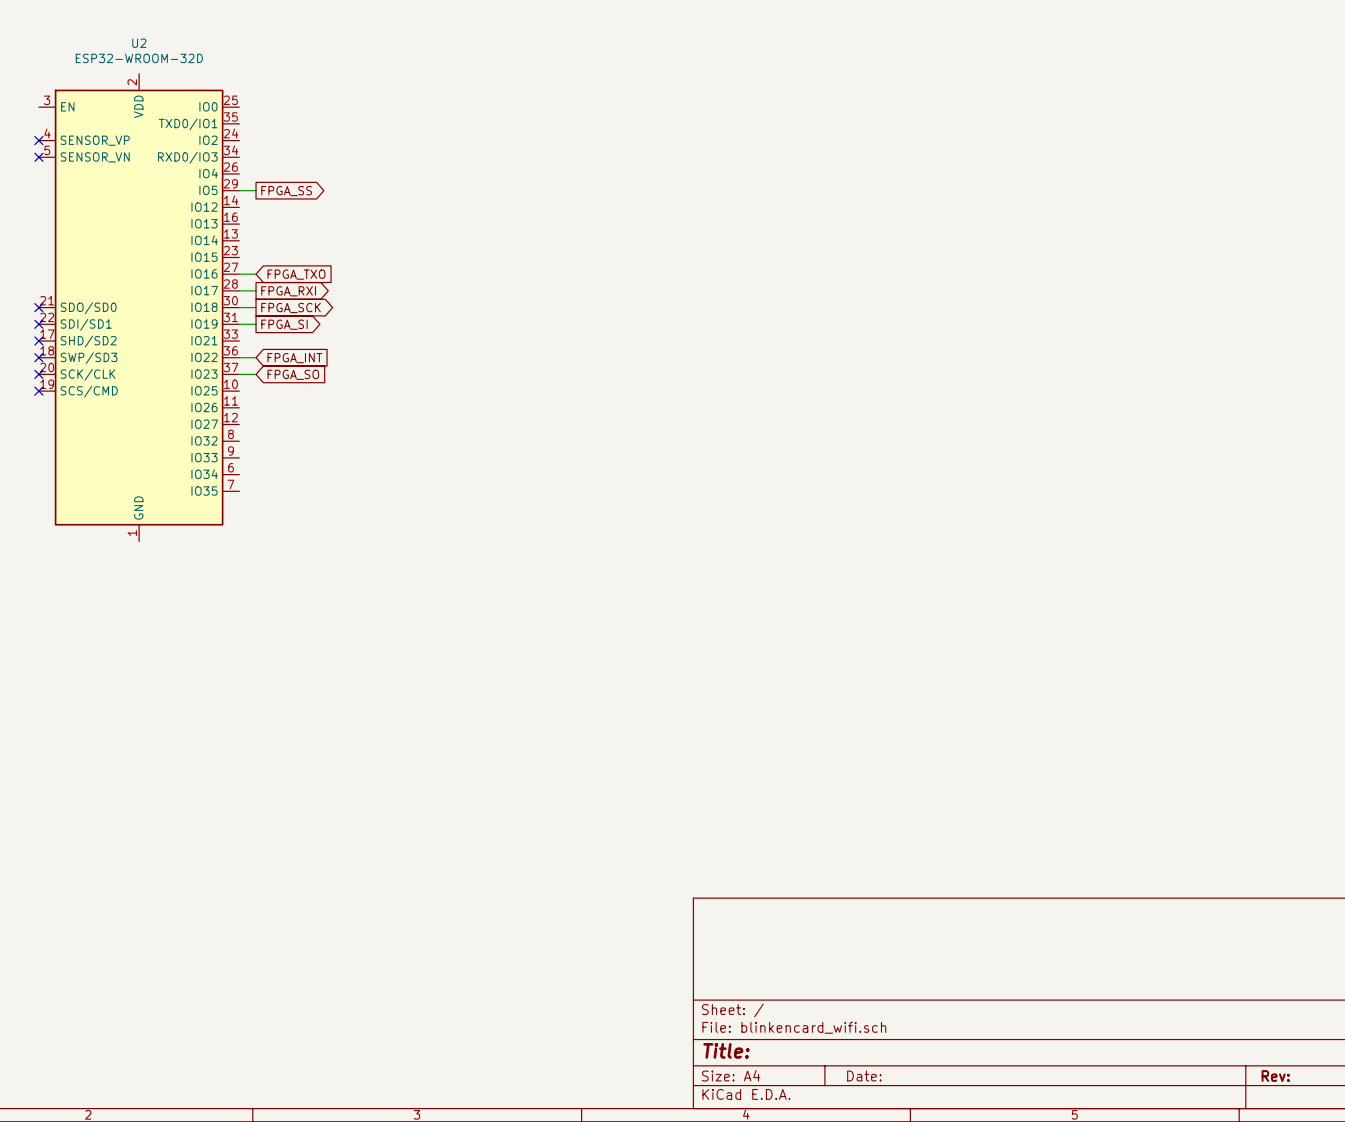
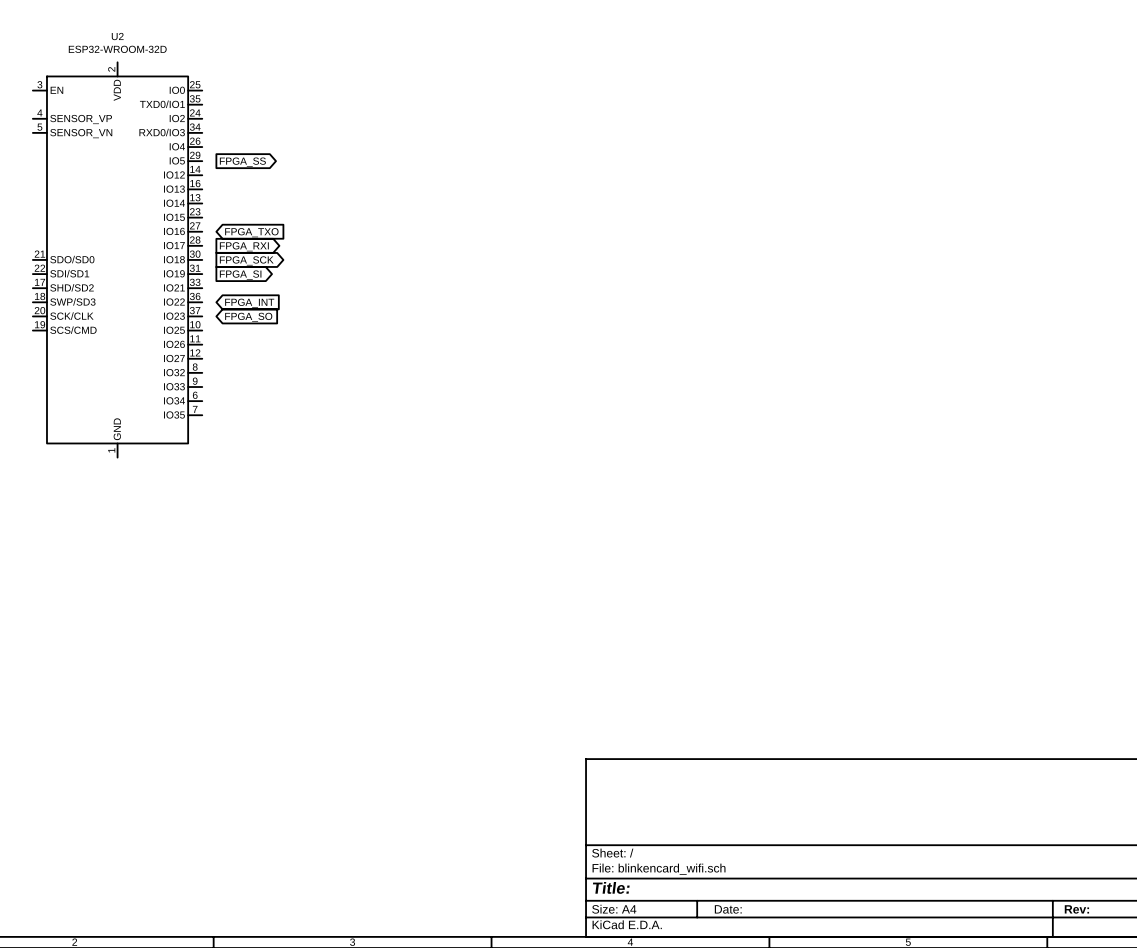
no-connect mark: (38, 140) -> none
no-connect mark: (38, 157) -> none
wire: (239, 190) (256, 190) -> none
wire: (239, 274) (256, 274) -> none
wire: (239, 290) (256, 290) -> none
no-connect mark: (38, 307) -> none
wire: (239, 307) (256, 307) -> none
no-connect mark: (38, 324) -> none
wire: (239, 324) (256, 324) -> none
no-connect mark: (38, 341) -> none
no-connect mark: (38, 357) -> none
wire: (239, 357) (256, 357) -> none
no-connect mark: (38, 374) -> none
wire: (239, 374) (256, 374) -> none
no-connect mark: (38, 391) -> none

